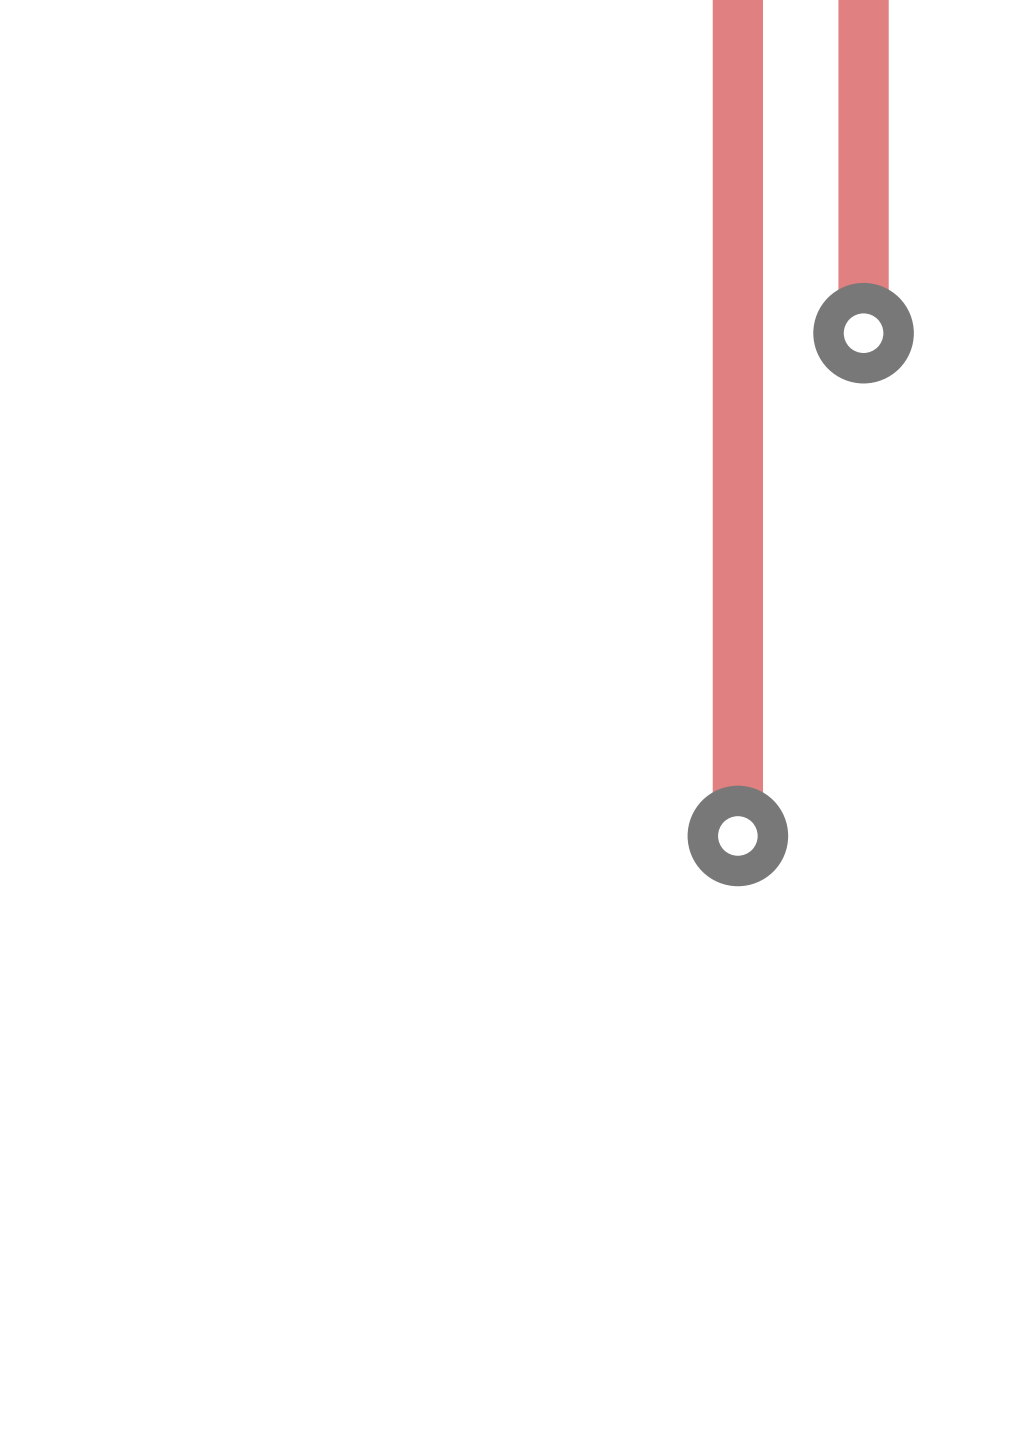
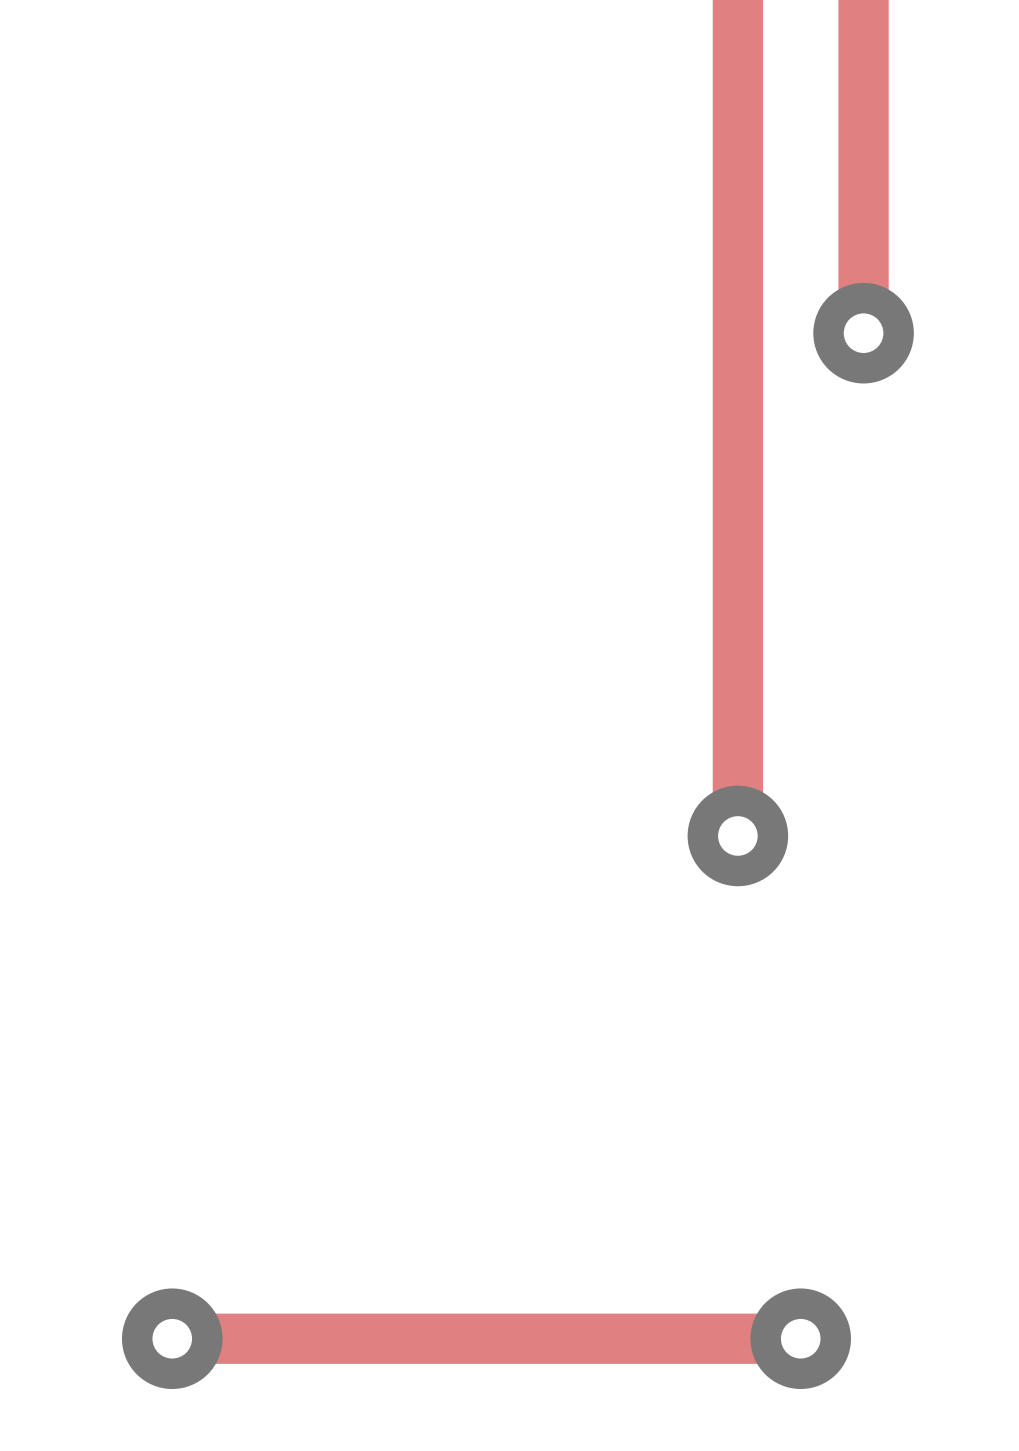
track: none -> (172, 1338) (800, 1338)
via: none -> (172, 1338)
via: none -> (800, 1338)

